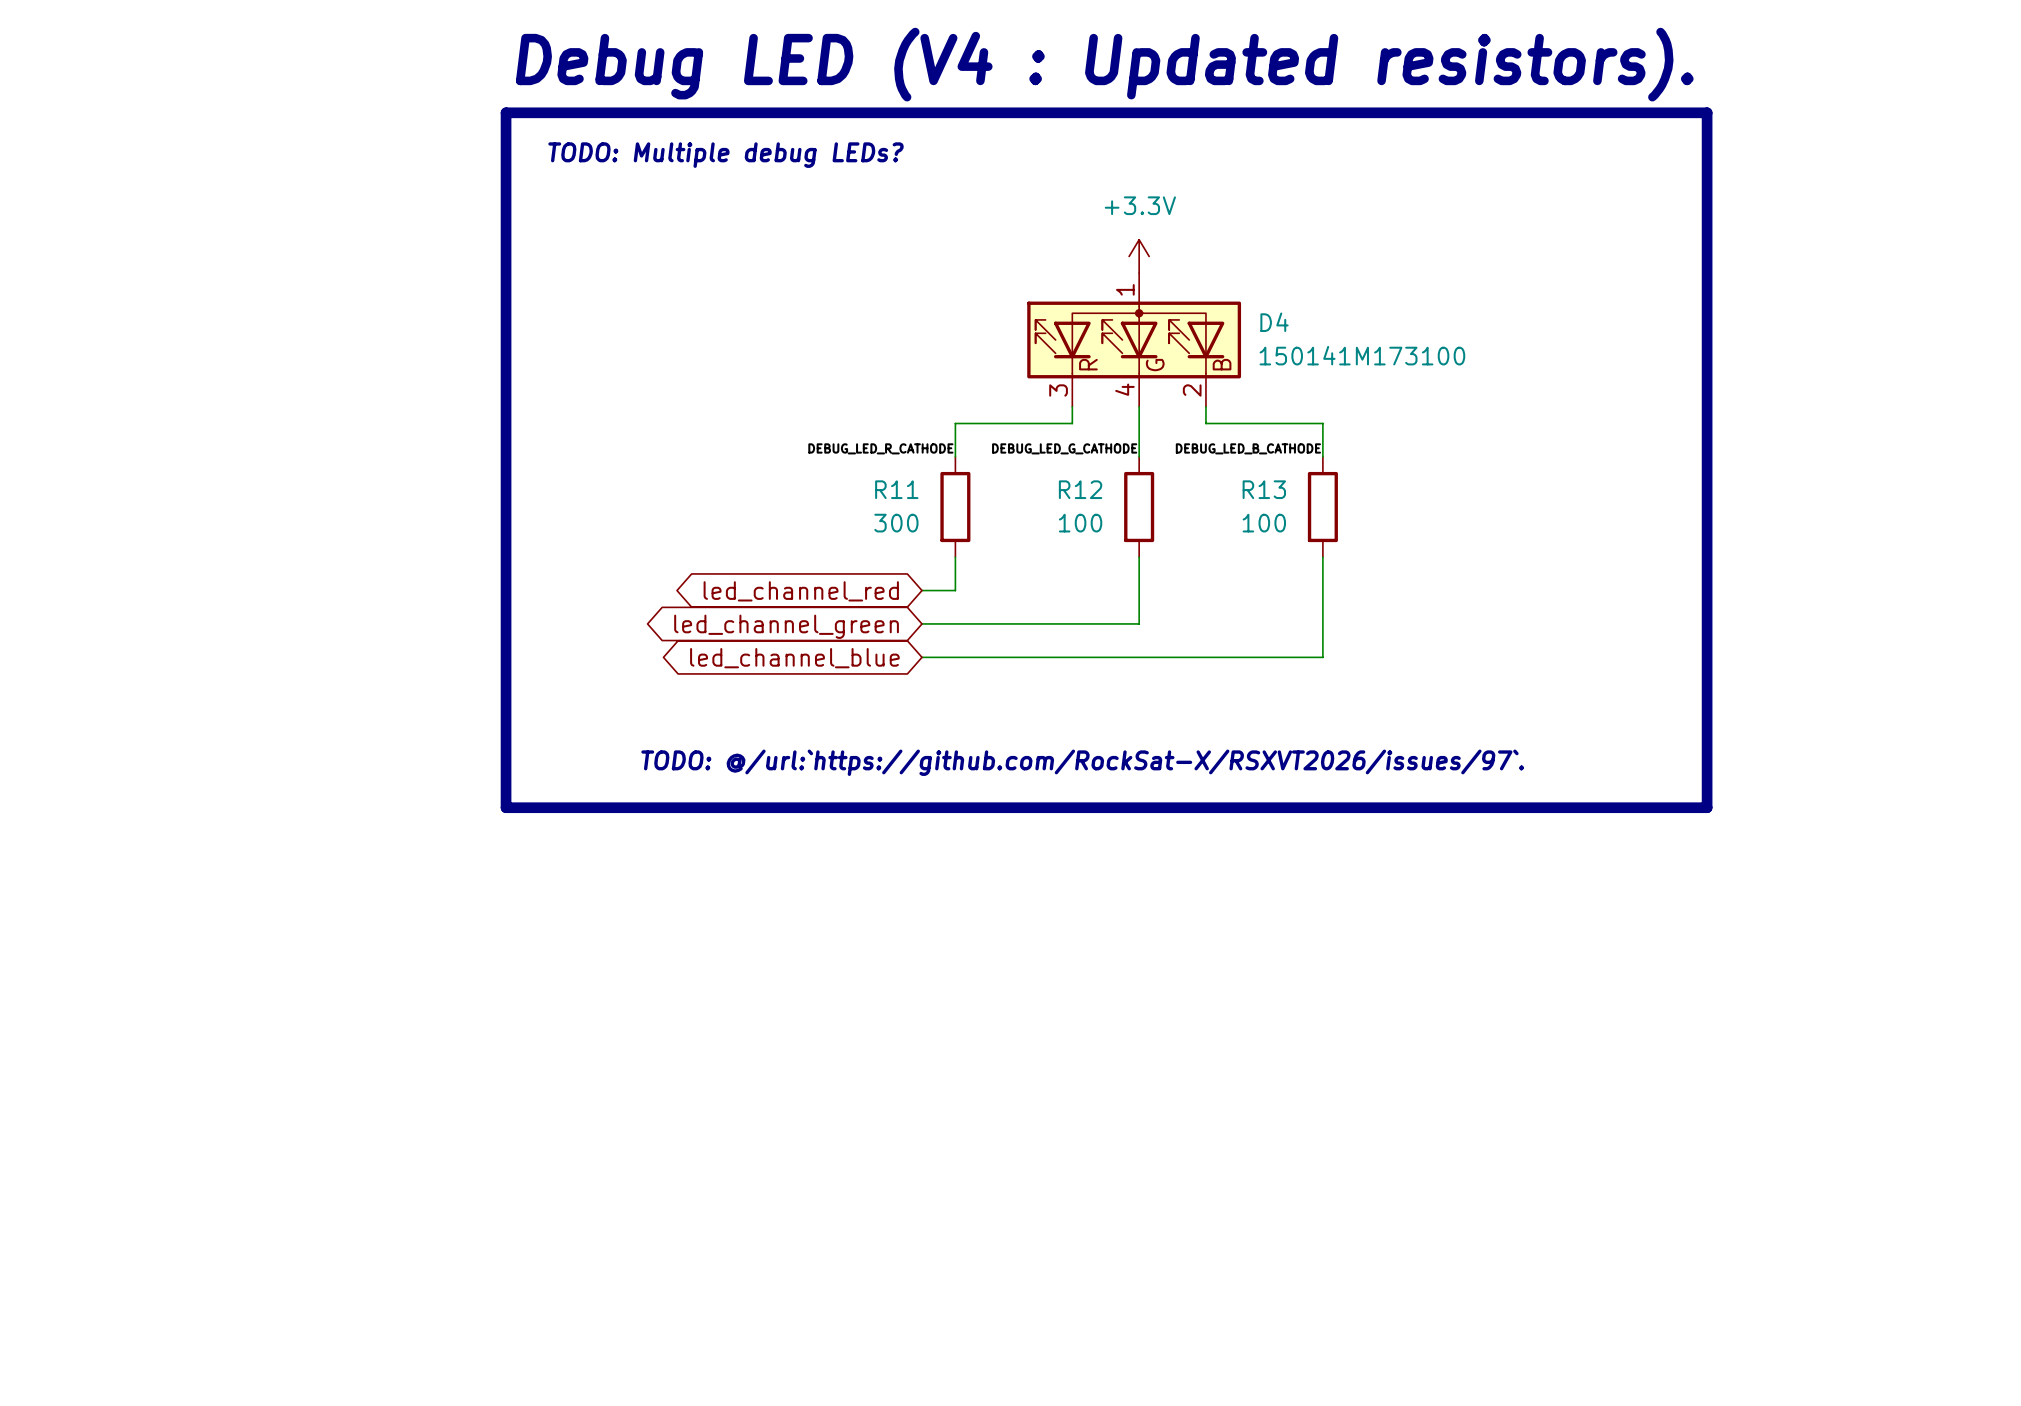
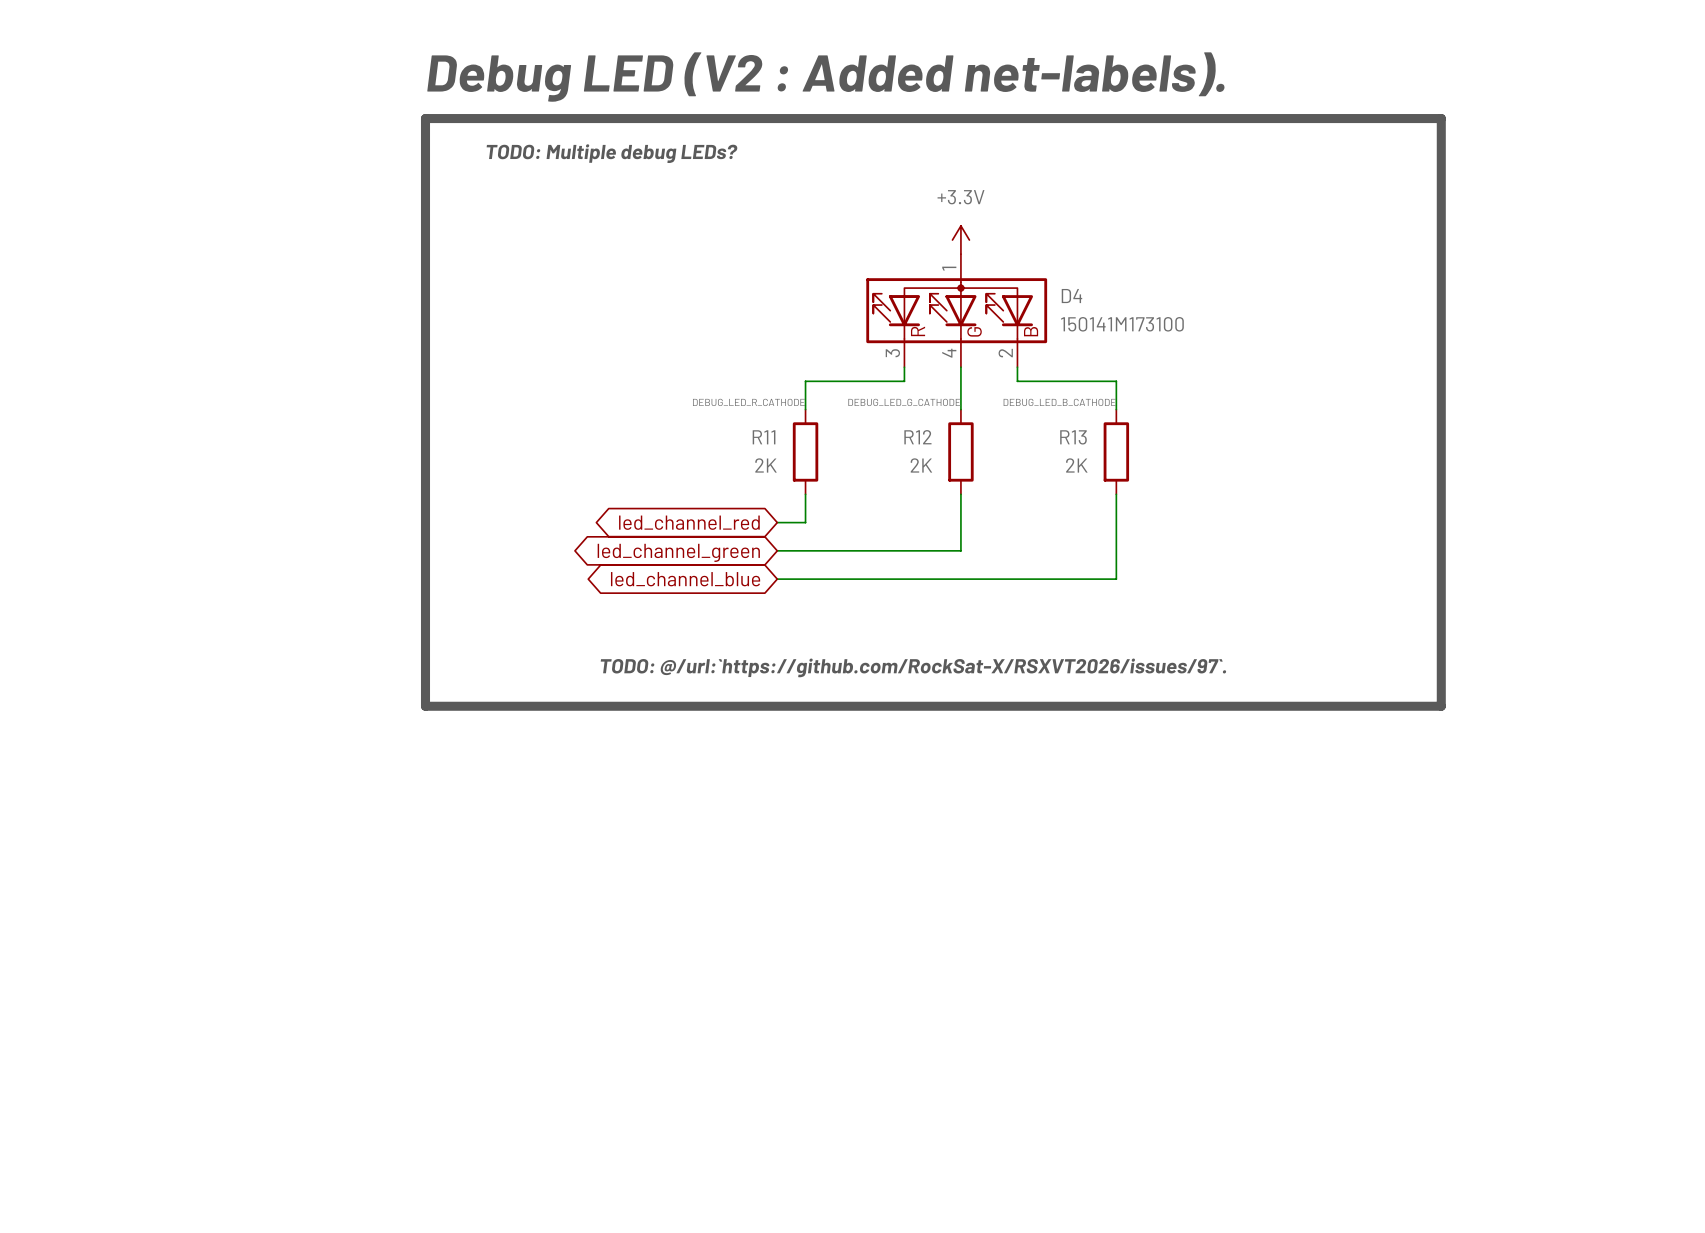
text: Debug LED (V4 : Updated resistors). (1104, 64) -> Debug LED (V2 : Added net-labels). (825, 77)
R11 value: 300 (896, 523) -> 2K (766, 465)
R12 value: 100 (1080, 523) -> 2K (921, 465)
R13 value: 100 (1264, 523) -> 2K (1076, 465)

